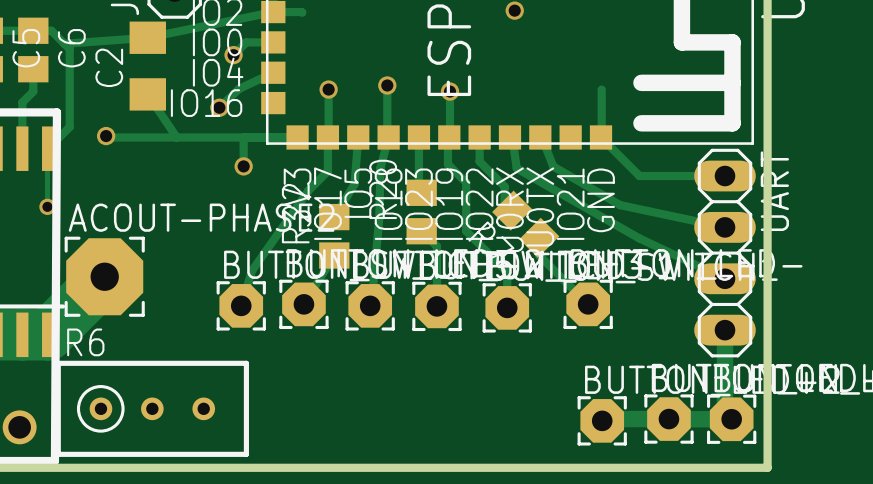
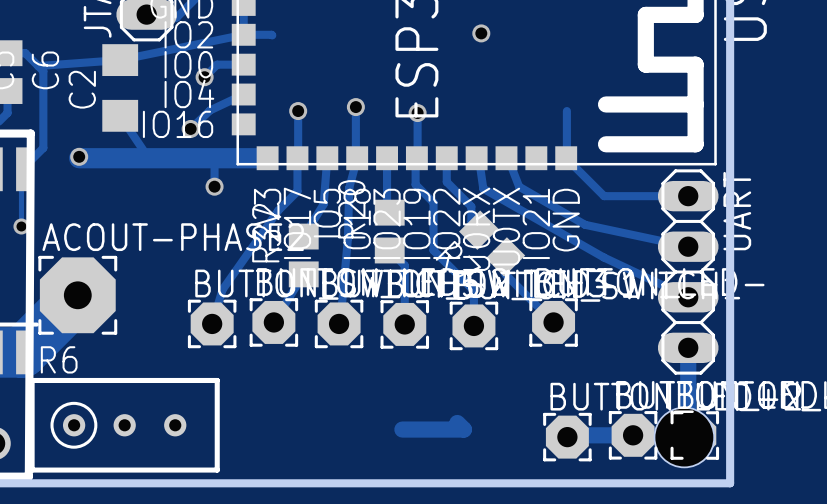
track width: thin (106, 137) (297, 137) -> thick (79, 158) (267, 158)
track: none -> (457, 422) (463, 429) (402, 429)
hole: none -> (684, 437)

